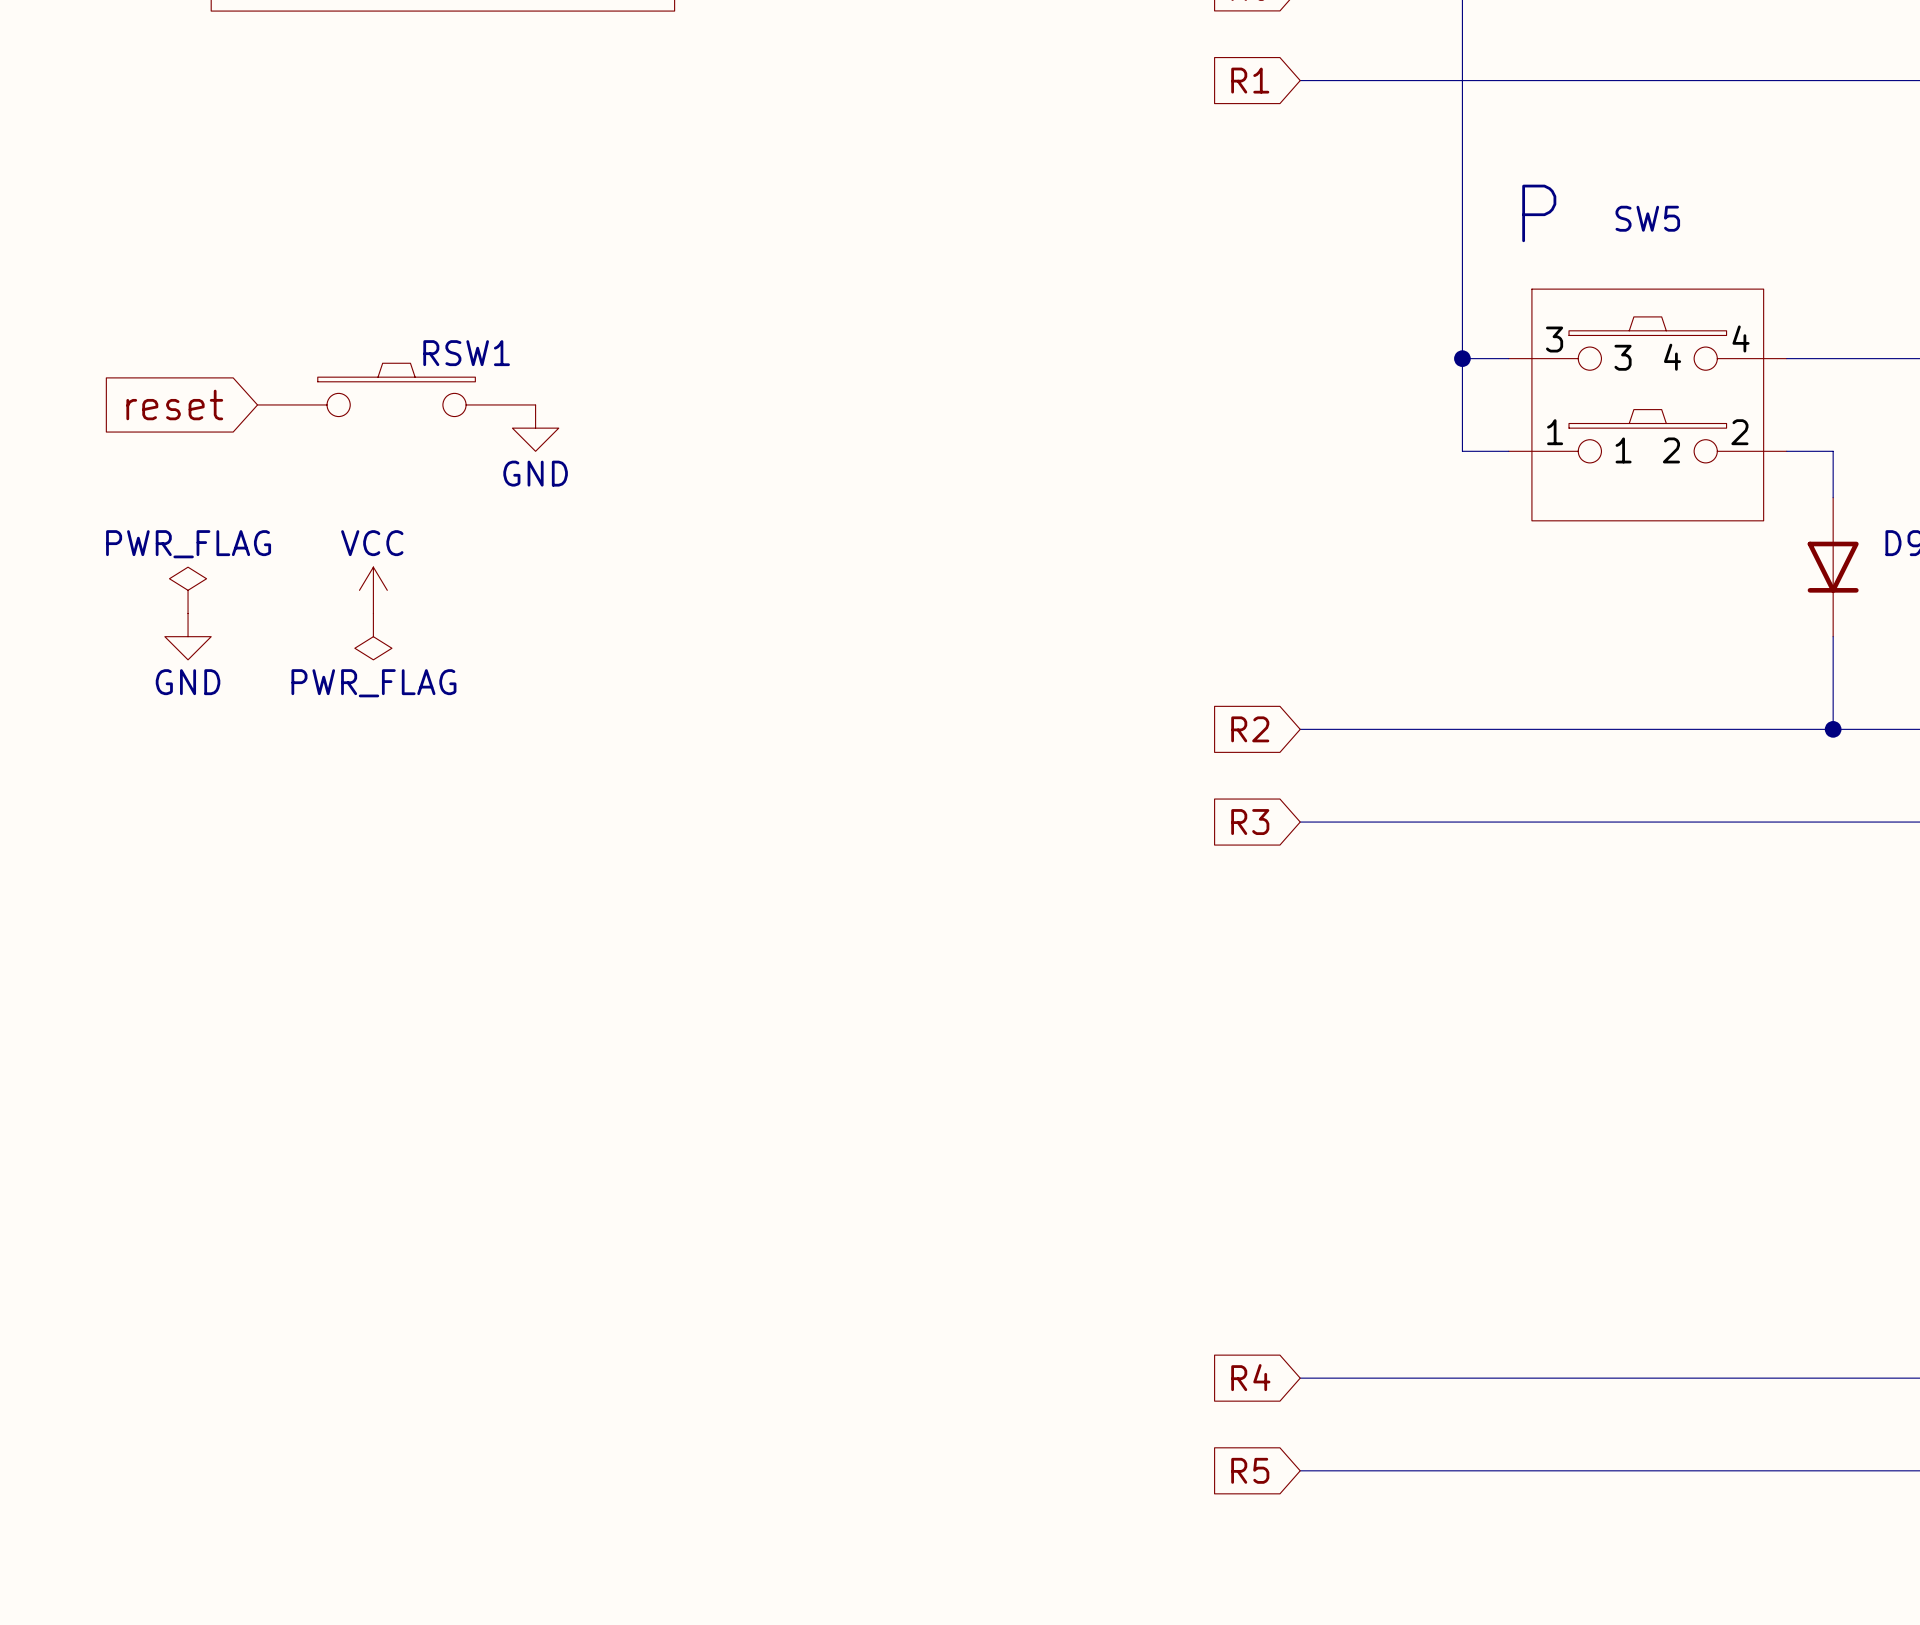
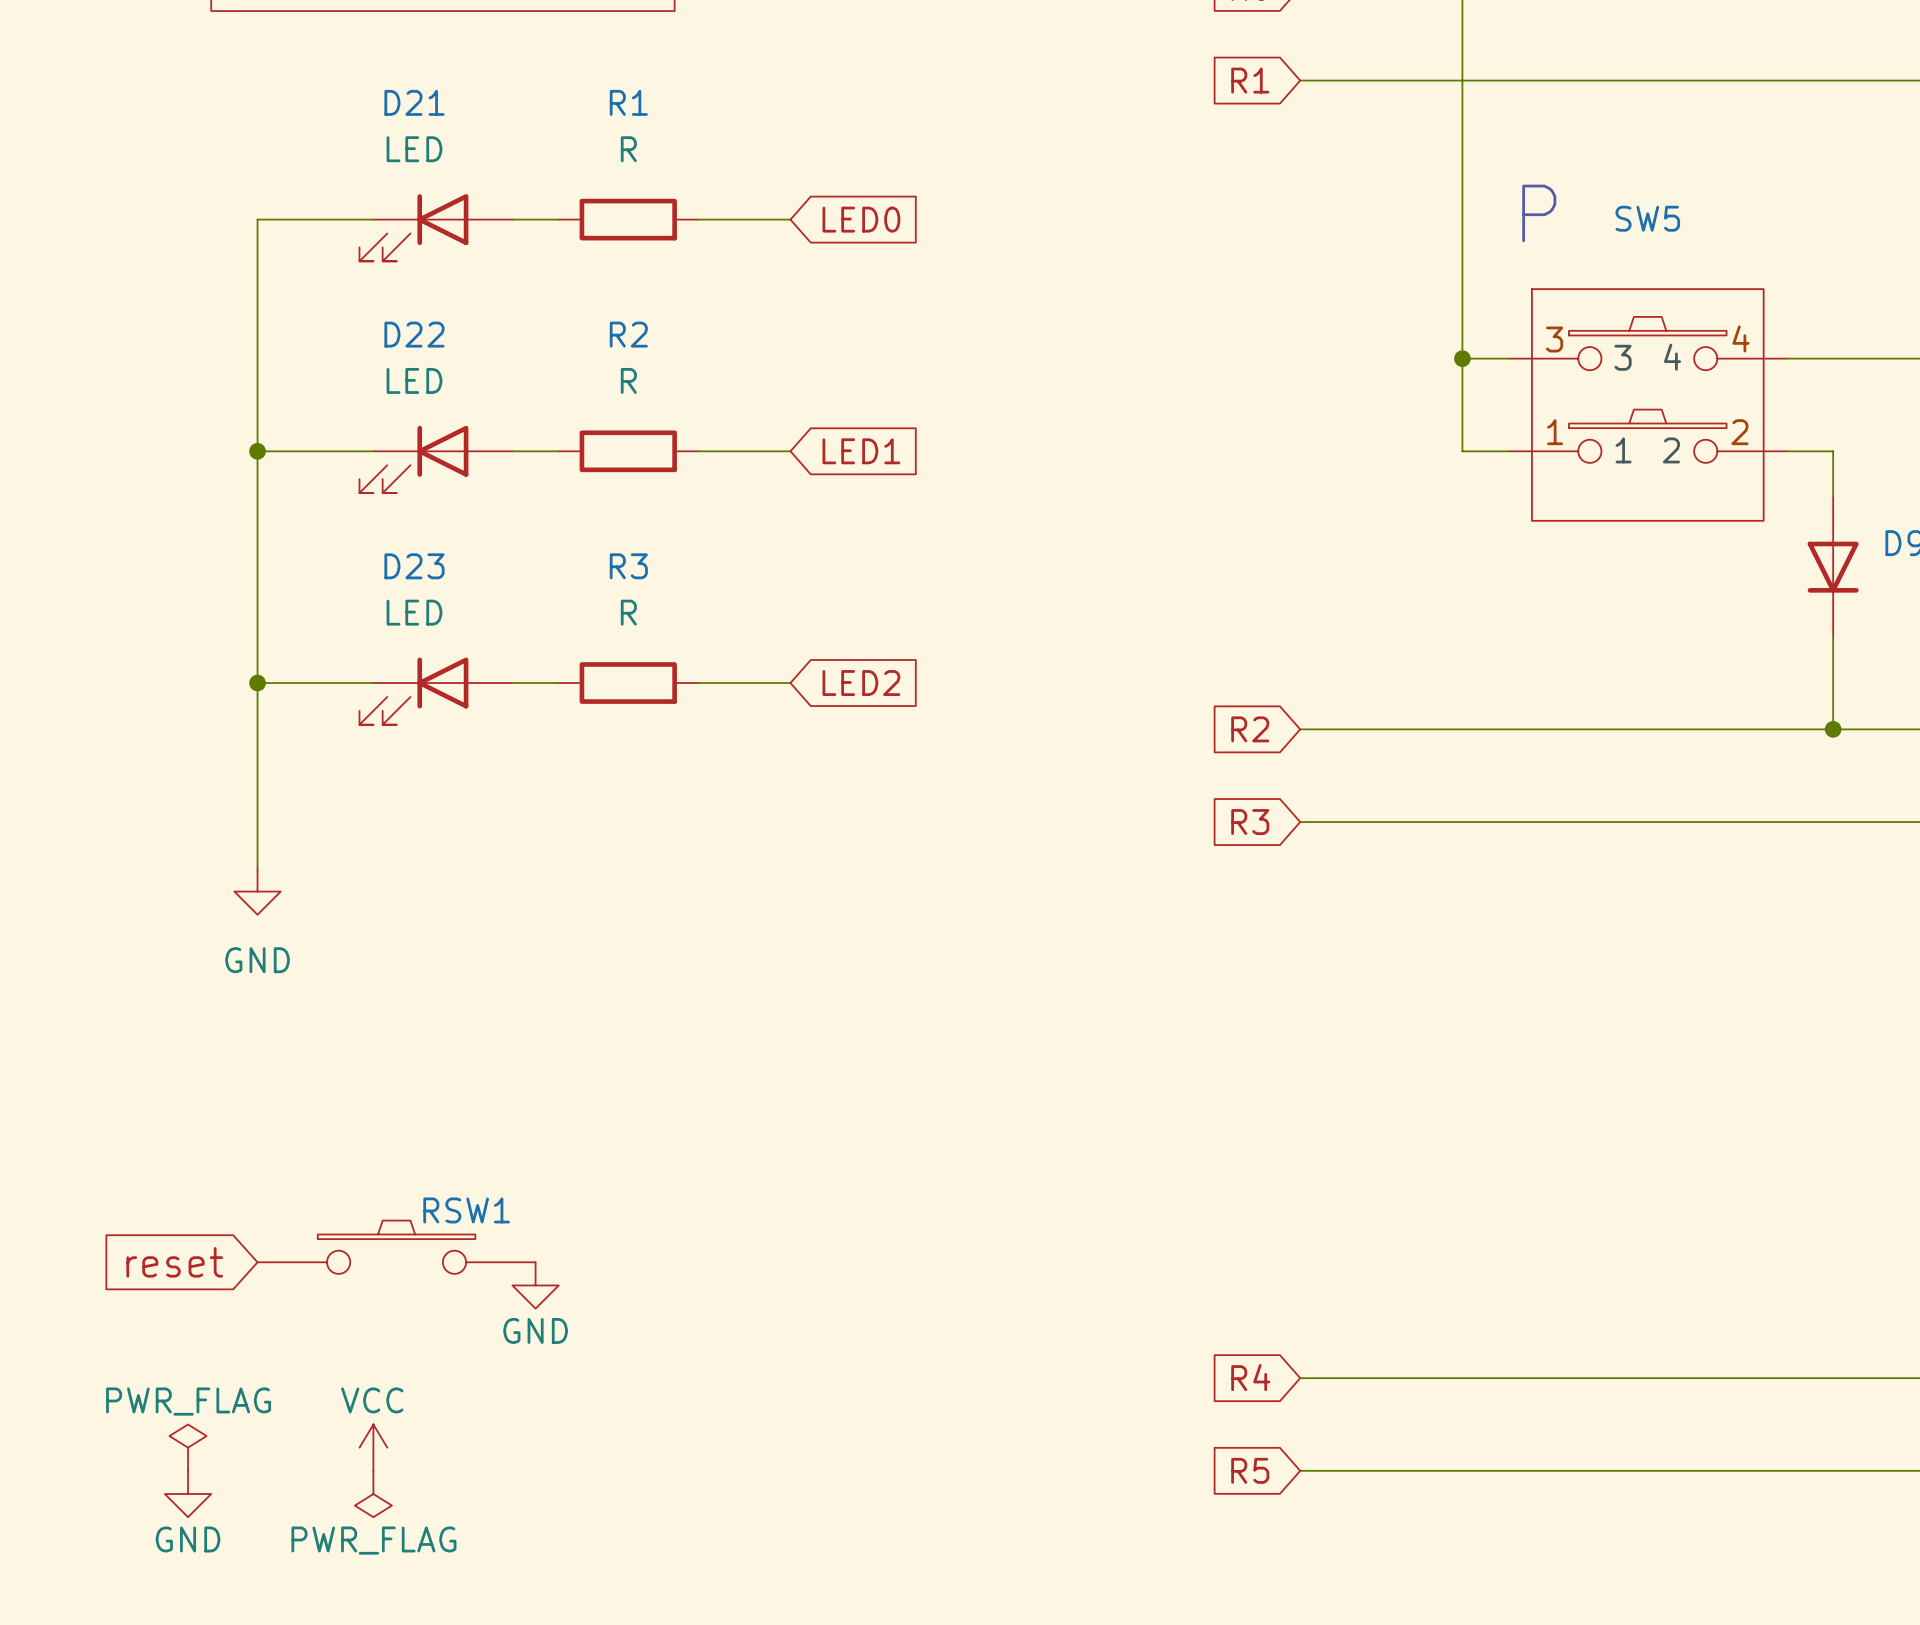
wire: none -> (373, 219) (257, 219) (257, 868)
wire: none -> (512, 219) (558, 219)
R1: none -> R (628, 219)
wire: none -> (697, 219) (790, 219)
global label: none -> LED0 (861, 219)
D21: none -> LED (435, 227)
RSW1 position: (396, 389) -> (396, 1247)
global label: reset (174, 404) -> none
power symbol: GND (535, 428) -> none
wire: none -> (257, 451) (373, 451)
junction: none -> (257, 451)
wire: none -> (512, 451) (558, 451)
R2: none -> R (628, 451)
wire: none -> (697, 451) (790, 451)
global label: none -> LED1 (861, 451)
D22: none -> LED (435, 459)
power symbol: PWR_FLAG (188, 590) -> none
power symbol: VCC (373, 590) -> none
power symbol position: GND (188, 636) -> GND (257, 891)
power symbol: PWR_FLAG (373, 636) -> none
power symbol text position: GND (188, 682) -> GND (257, 960)
wire: none -> (257, 683) (373, 683)
junction: none -> (257, 683)
wire: none -> (512, 683) (558, 683)
R3: none -> R (628, 683)
wire: none -> (697, 683) (790, 683)
global label: none -> LED2 (861, 683)
D23: none -> LED (435, 691)
global label: none -> reset (174, 1262)
power symbol: none -> GND (535, 1285)
power symbol: none -> PWR_FLAG (188, 1447)
power symbol: none -> VCC (373, 1447)
power symbol: none -> GND (188, 1494)
power symbol: none -> PWR_FLAG (373, 1494)

